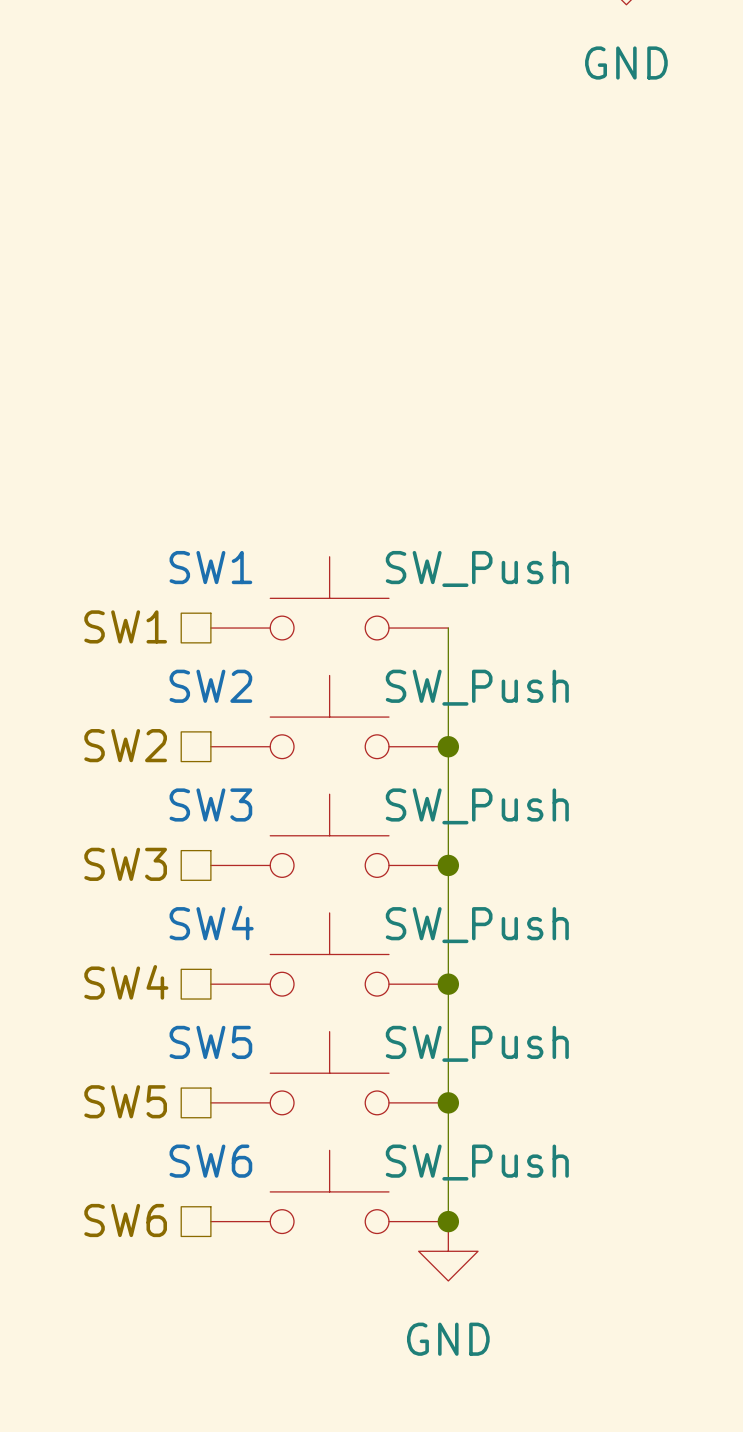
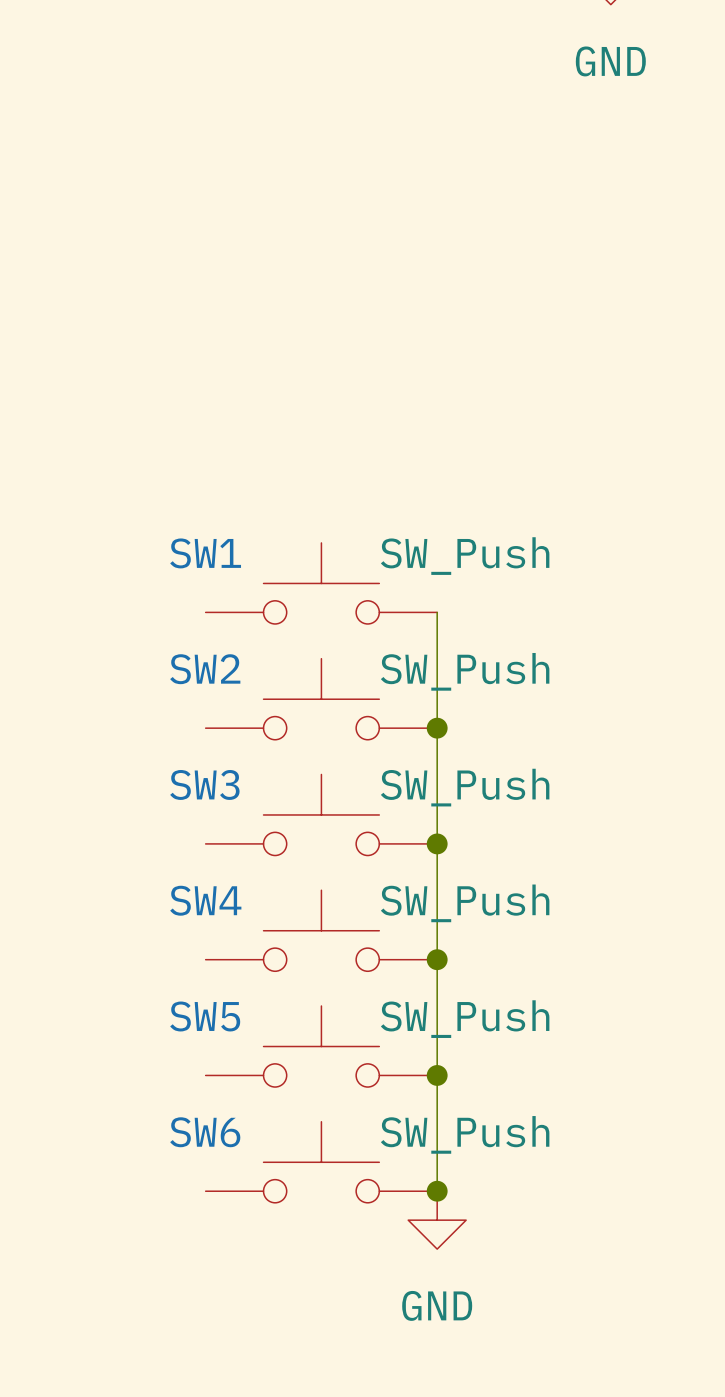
hierarchical label: SW1 (125, 626) -> none
hierarchical label: SW2 (125, 745) -> none
hierarchical label: SW3 (125, 864) -> none
hierarchical label: SW4 (126, 982) -> none
hierarchical label: SW5 (125, 1101) -> none
hierarchical label: SW6 (125, 1220) -> none

